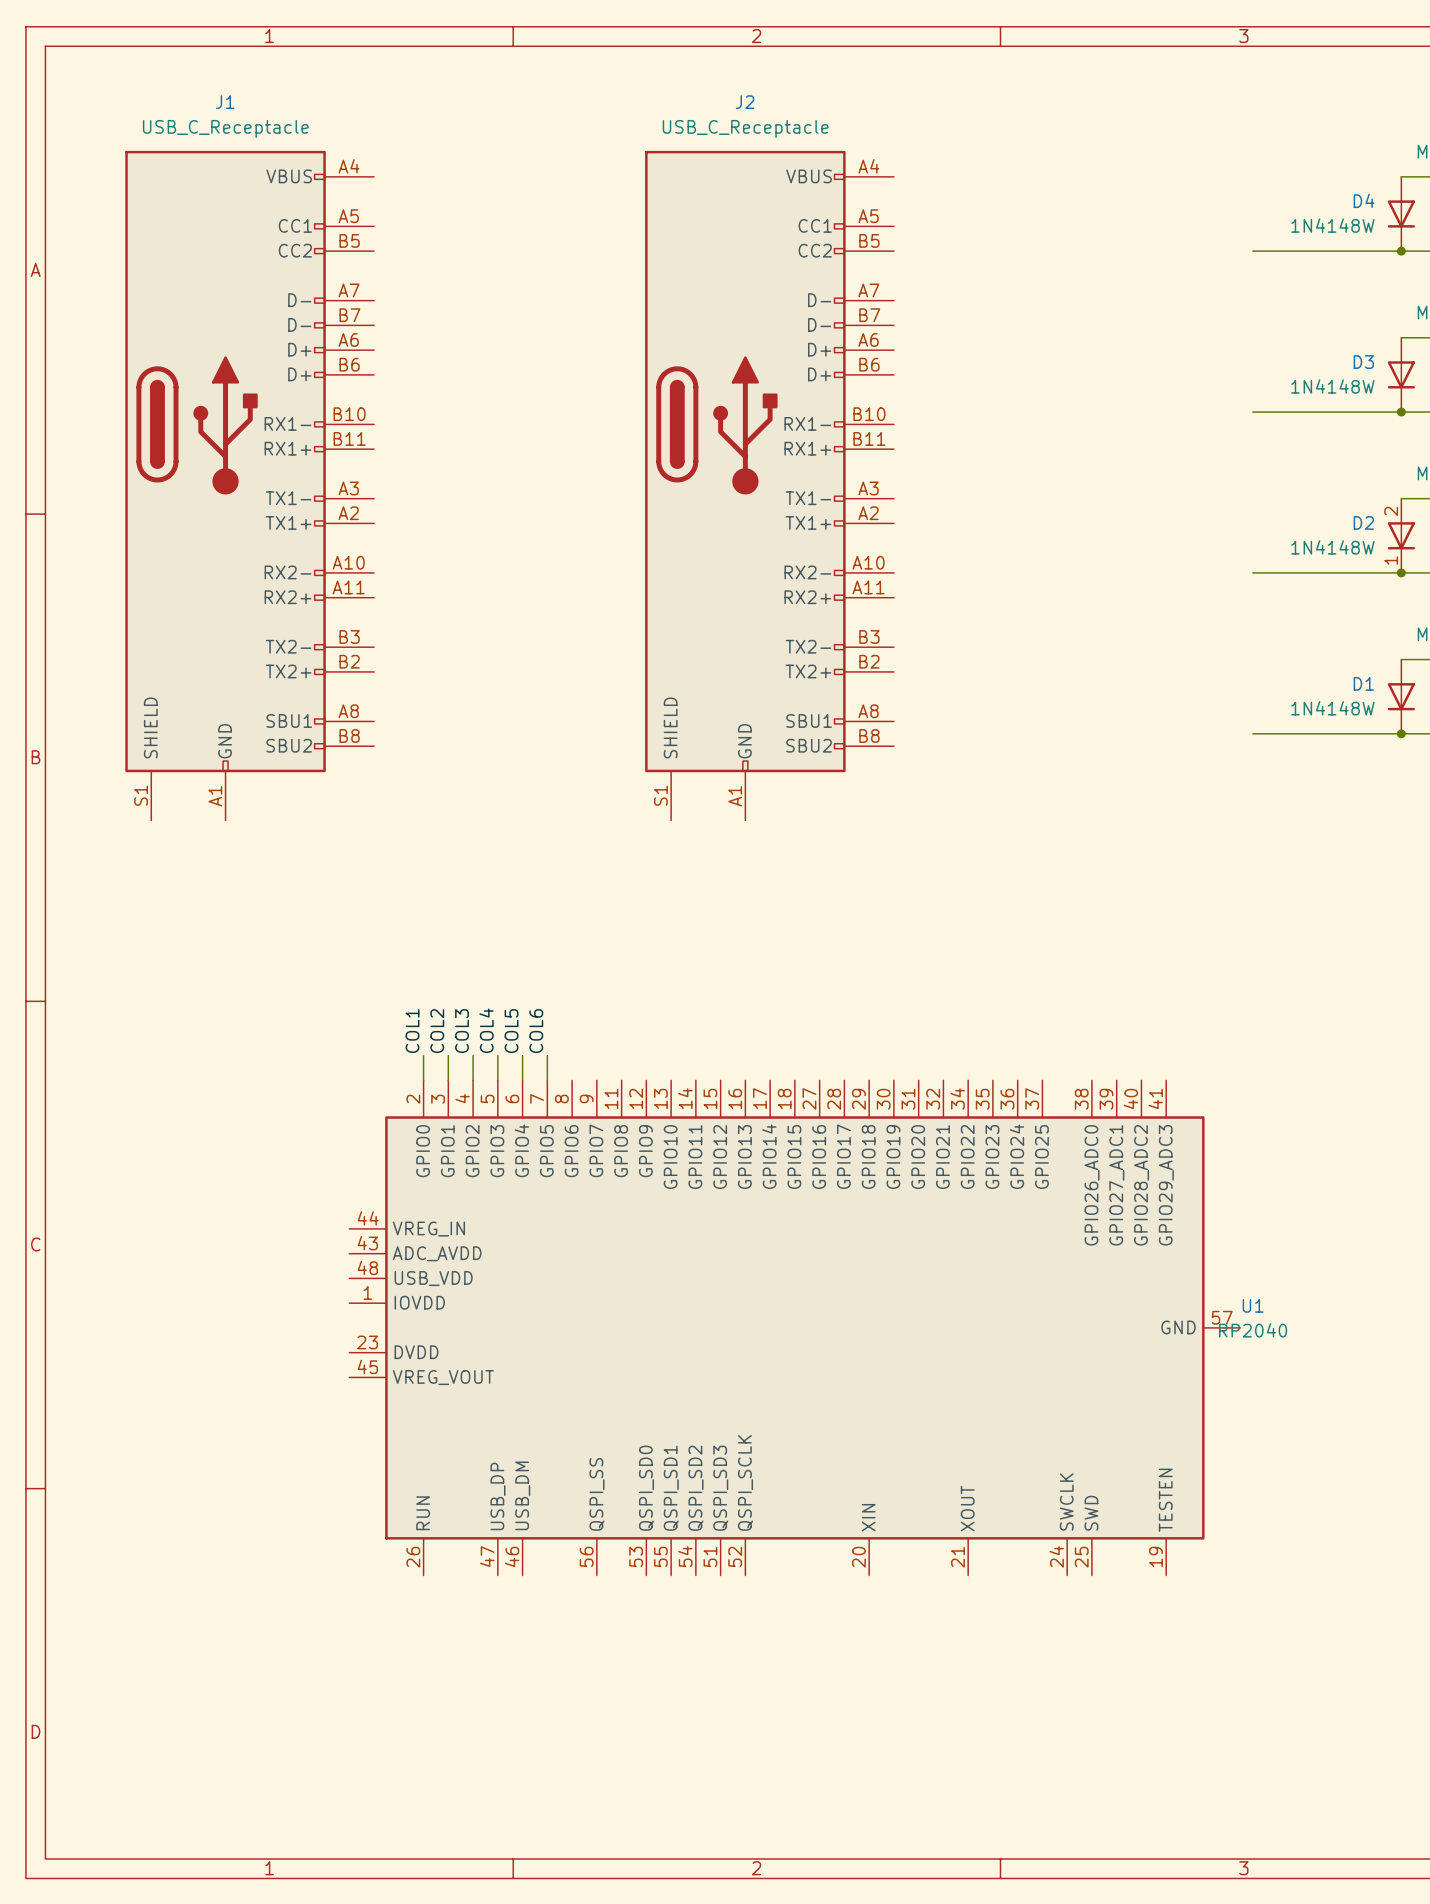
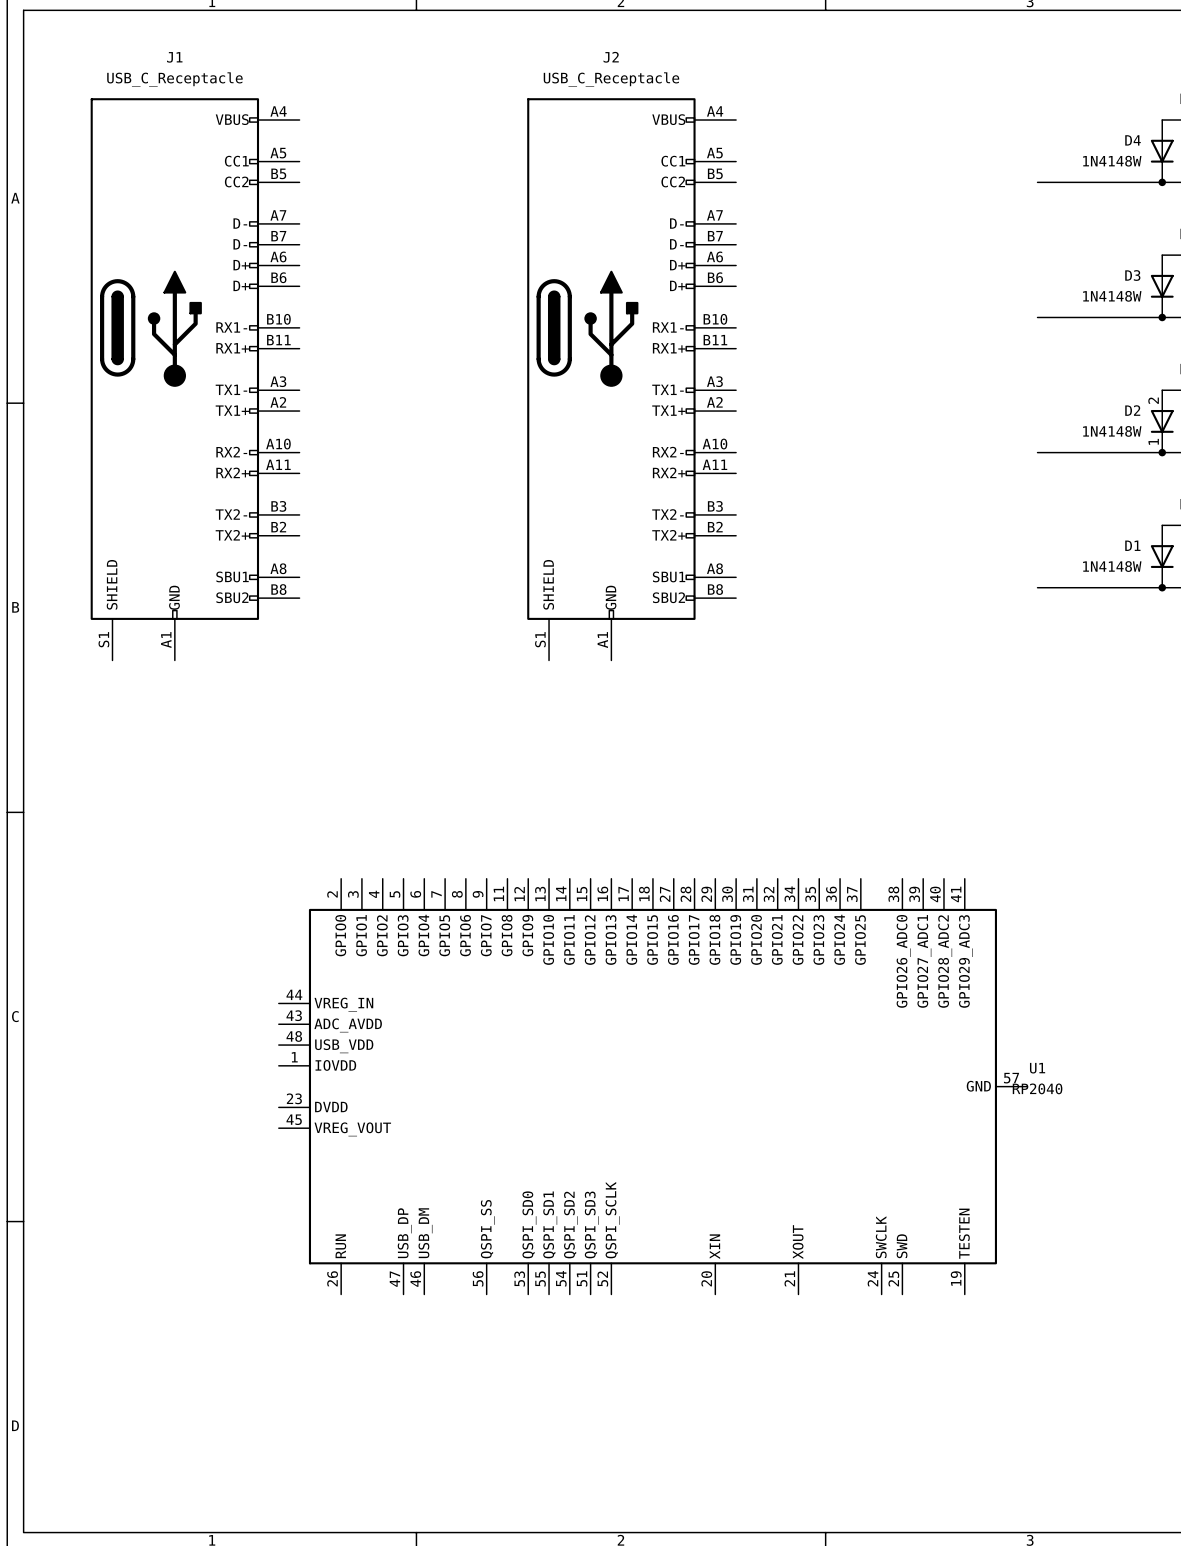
label: COL4 (486, 1030) -> none
label: COL1 (412, 1031) -> none
label: COL2 (437, 1031) -> none
label: COL3 (462, 1031) -> none
label: COL5 (511, 1031) -> none
label: COL6 (536, 1031) -> none
wire: (423, 1055) (423, 1080) -> none
wire: (448, 1055) (448, 1080) -> none
wire: (473, 1055) (473, 1080) -> none
wire: (497, 1055) (497, 1080) -> none
wire: (522, 1055) (522, 1080) -> none
wire: (547, 1055) (547, 1080) -> none

